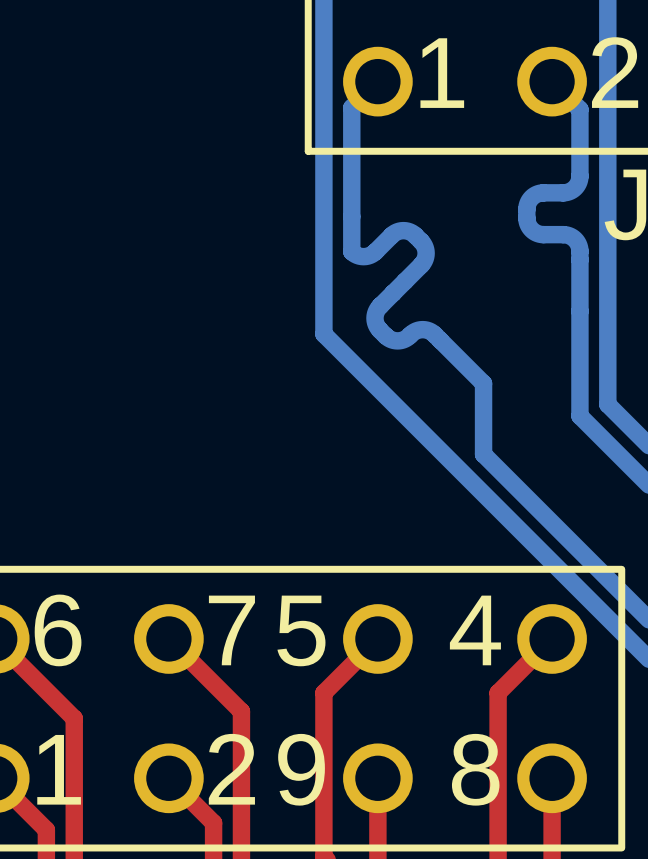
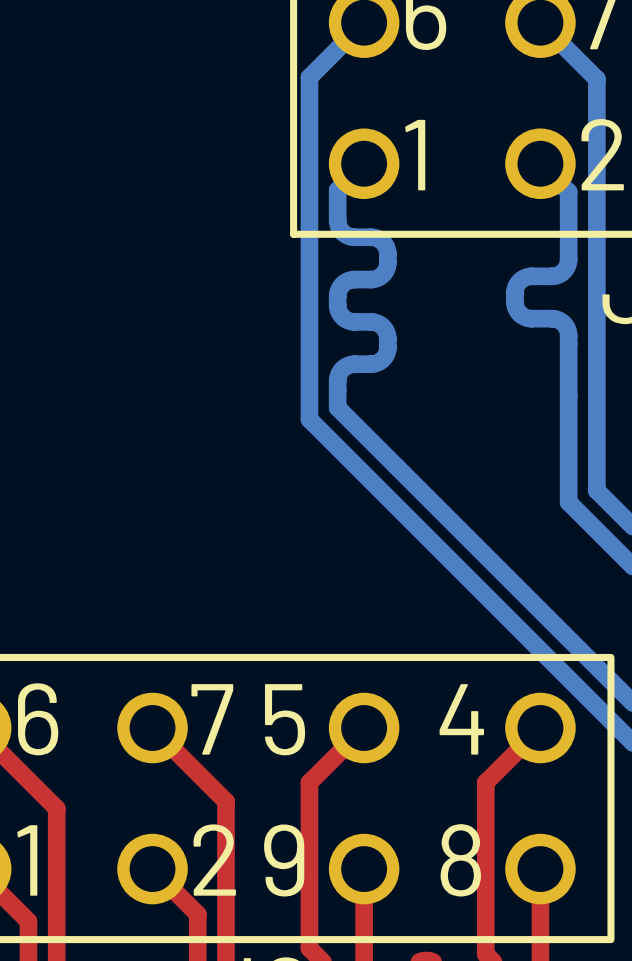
bottom track: (351, 137) (351, 212) -> (337, 220) (340, 229) (345, 234) (352, 237) (378, 238) (385, 245) (387, 254) (386, 268) (381, 275) (372, 279) (347, 281) (340, 287) (337, 296)
bottom track: (351, 221) (351, 251) (359, 256) (371, 254) (393, 234) (401, 230) (411, 232) (423, 244) (426, 253) (423, 262) (378, 308) (375, 313) (375, 322) (385, 335) (395, 340) (404, 339) (418, 330) (431, 331) (483, 383) (483, 454) -> (337, 304) (339, 312) (345, 319) (352, 321) (378, 323) (385, 329) (387, 338) (386, 352) (379, 361) (372, 364) (350, 364) (341, 370) (337, 379) (337, 407) (471, 541)

